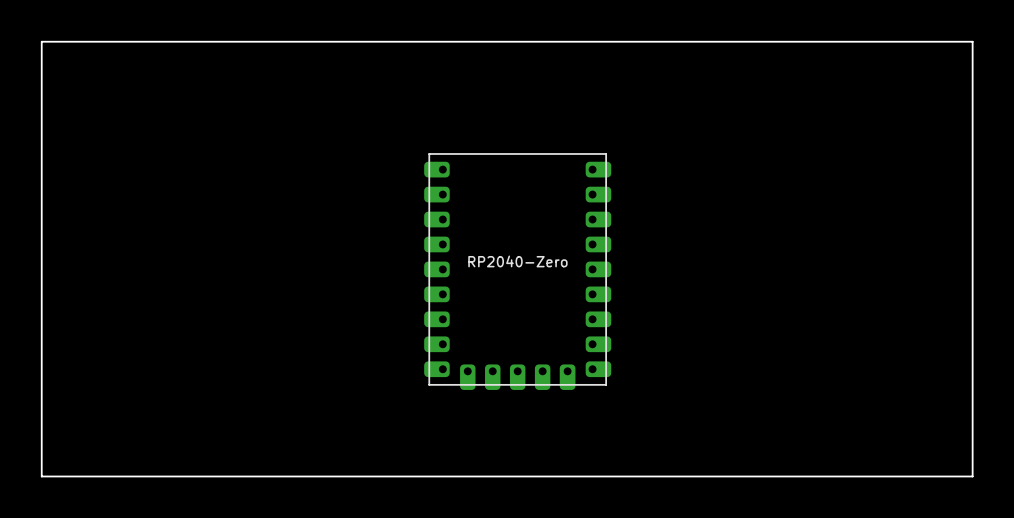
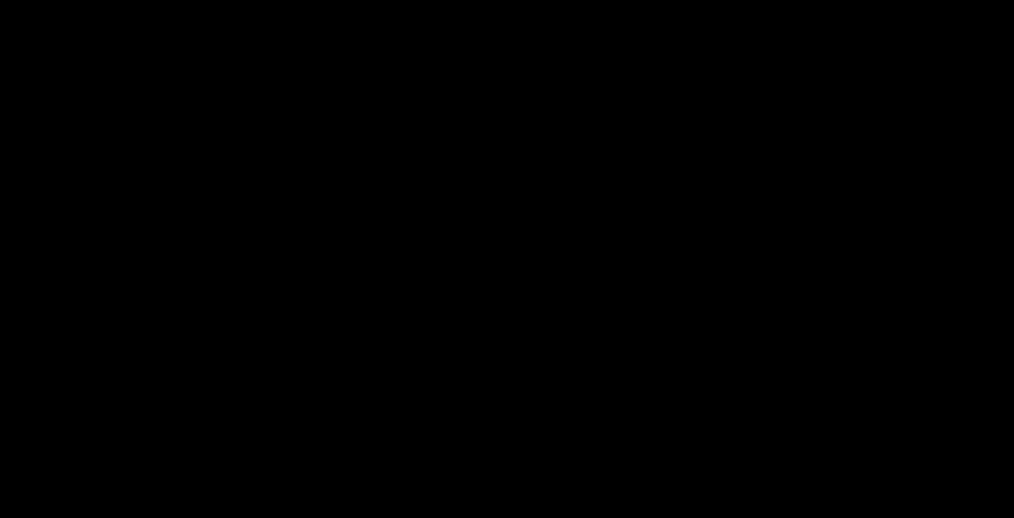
board edge: (41, 41) (972, 41) (972, 476) (41, 476) (41, 41) -> none
part: RP2040-Zero (517, 271) -> none

